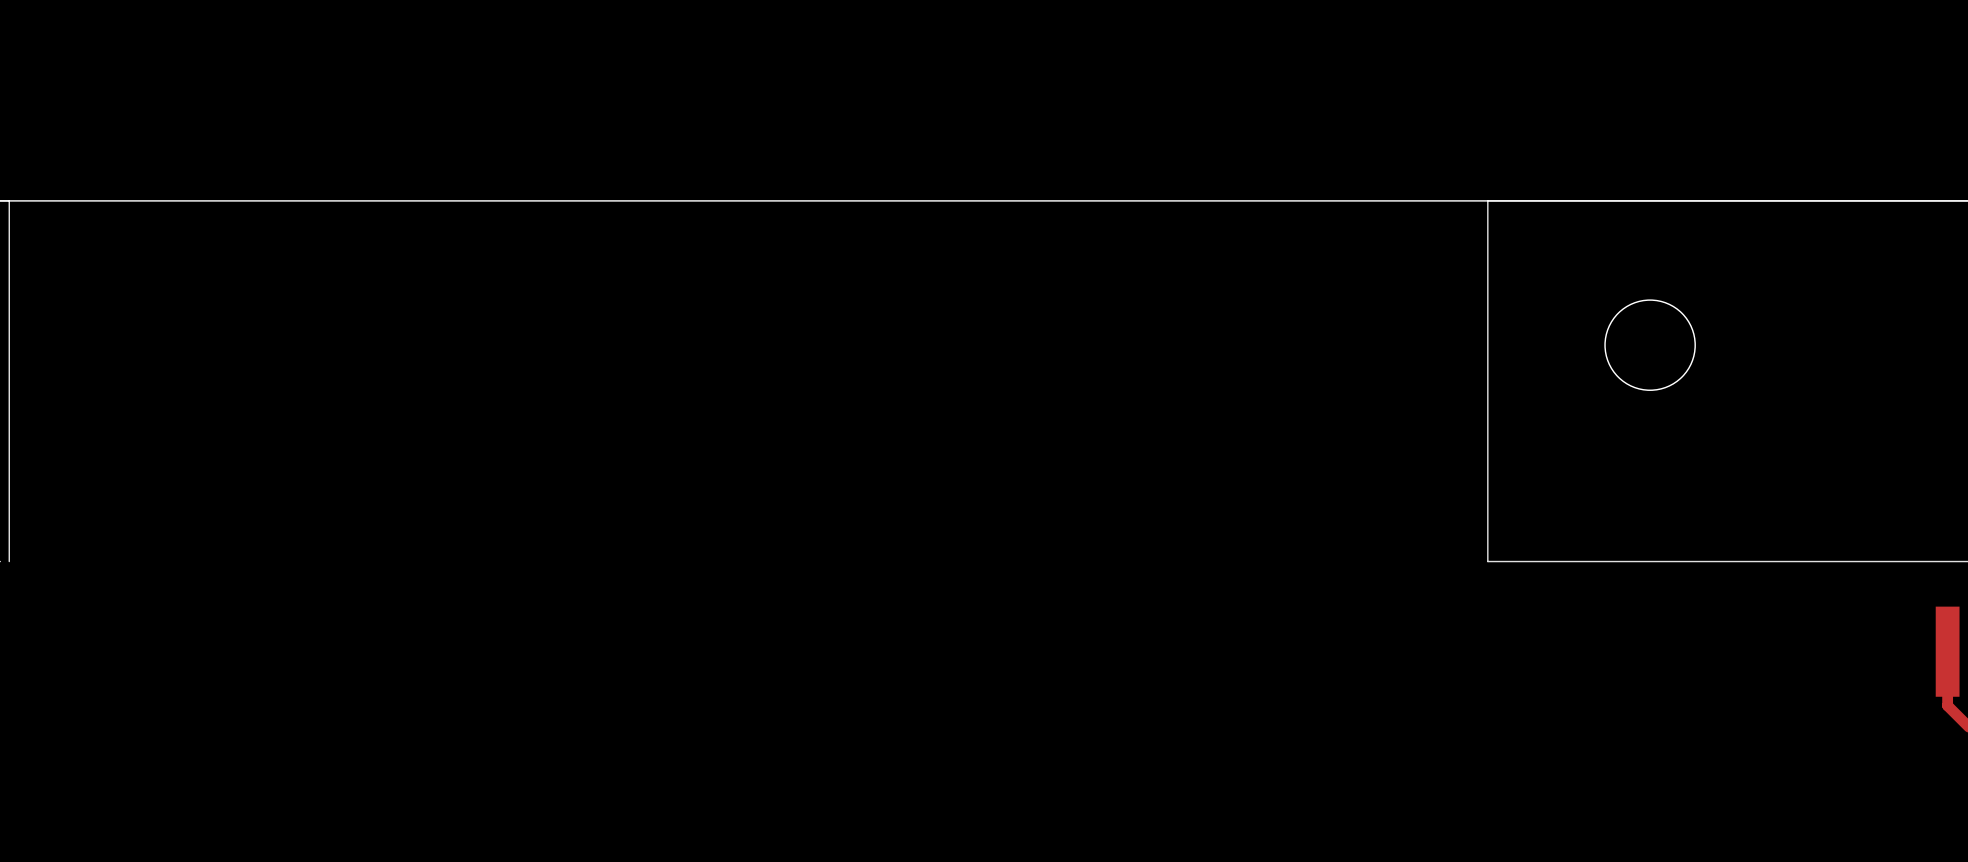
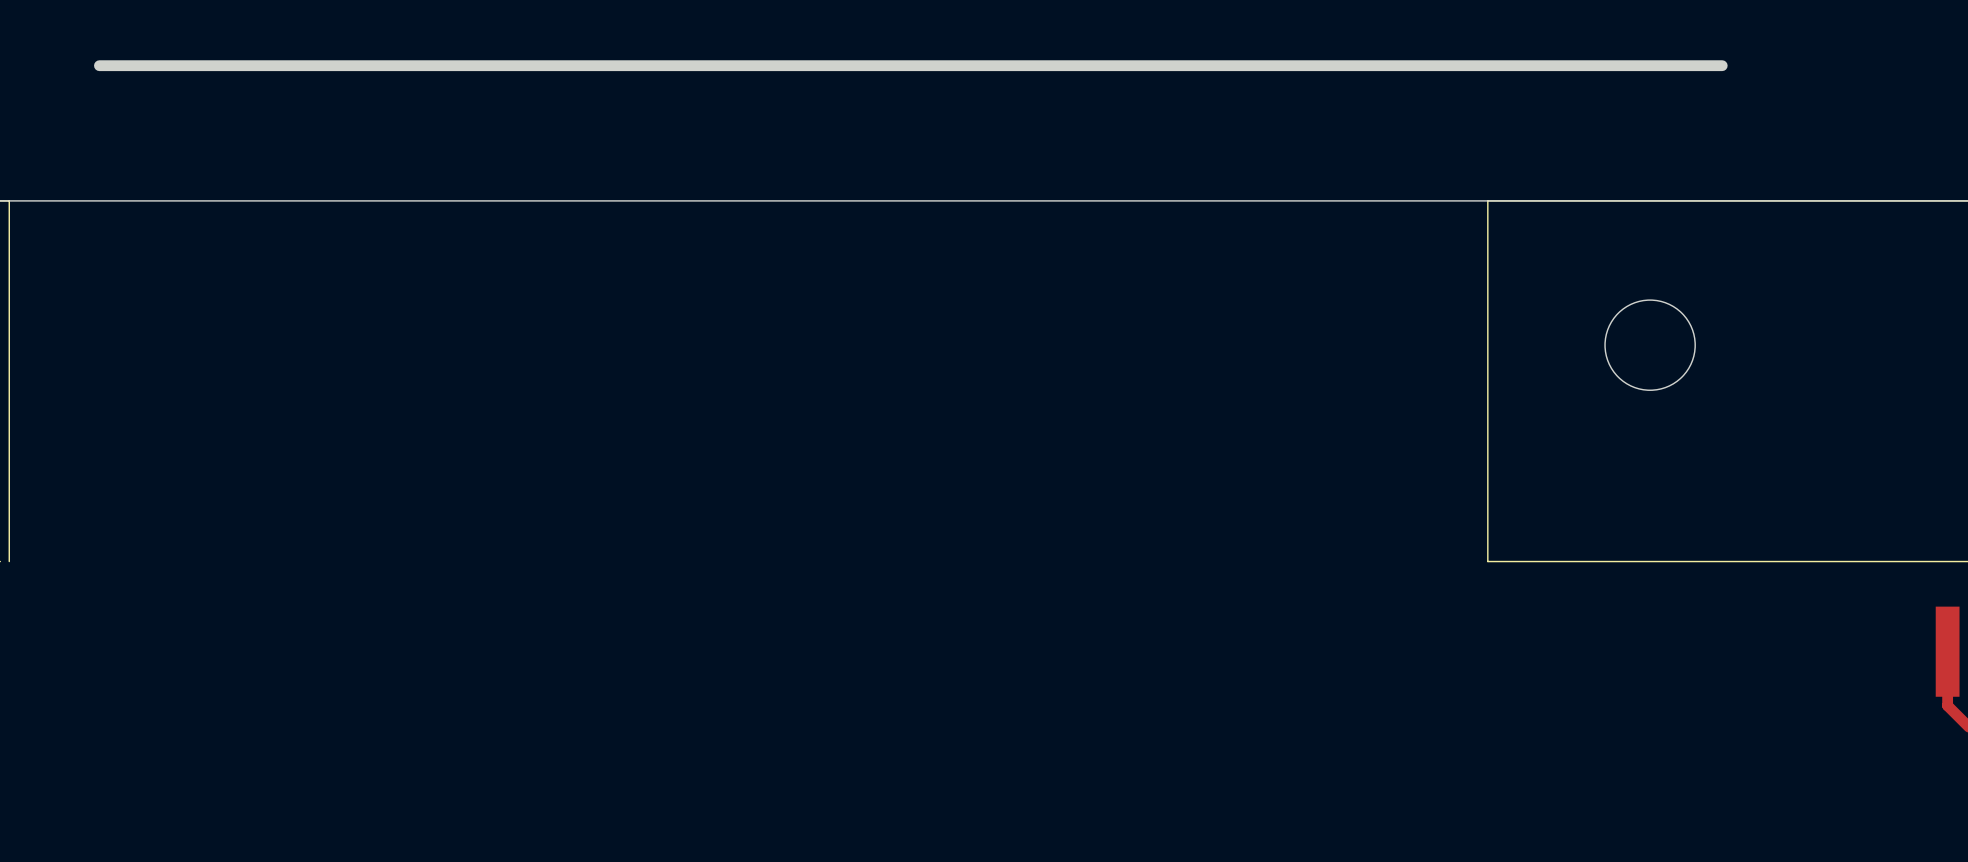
board edge: none -> (99, 65) (1722, 65)

